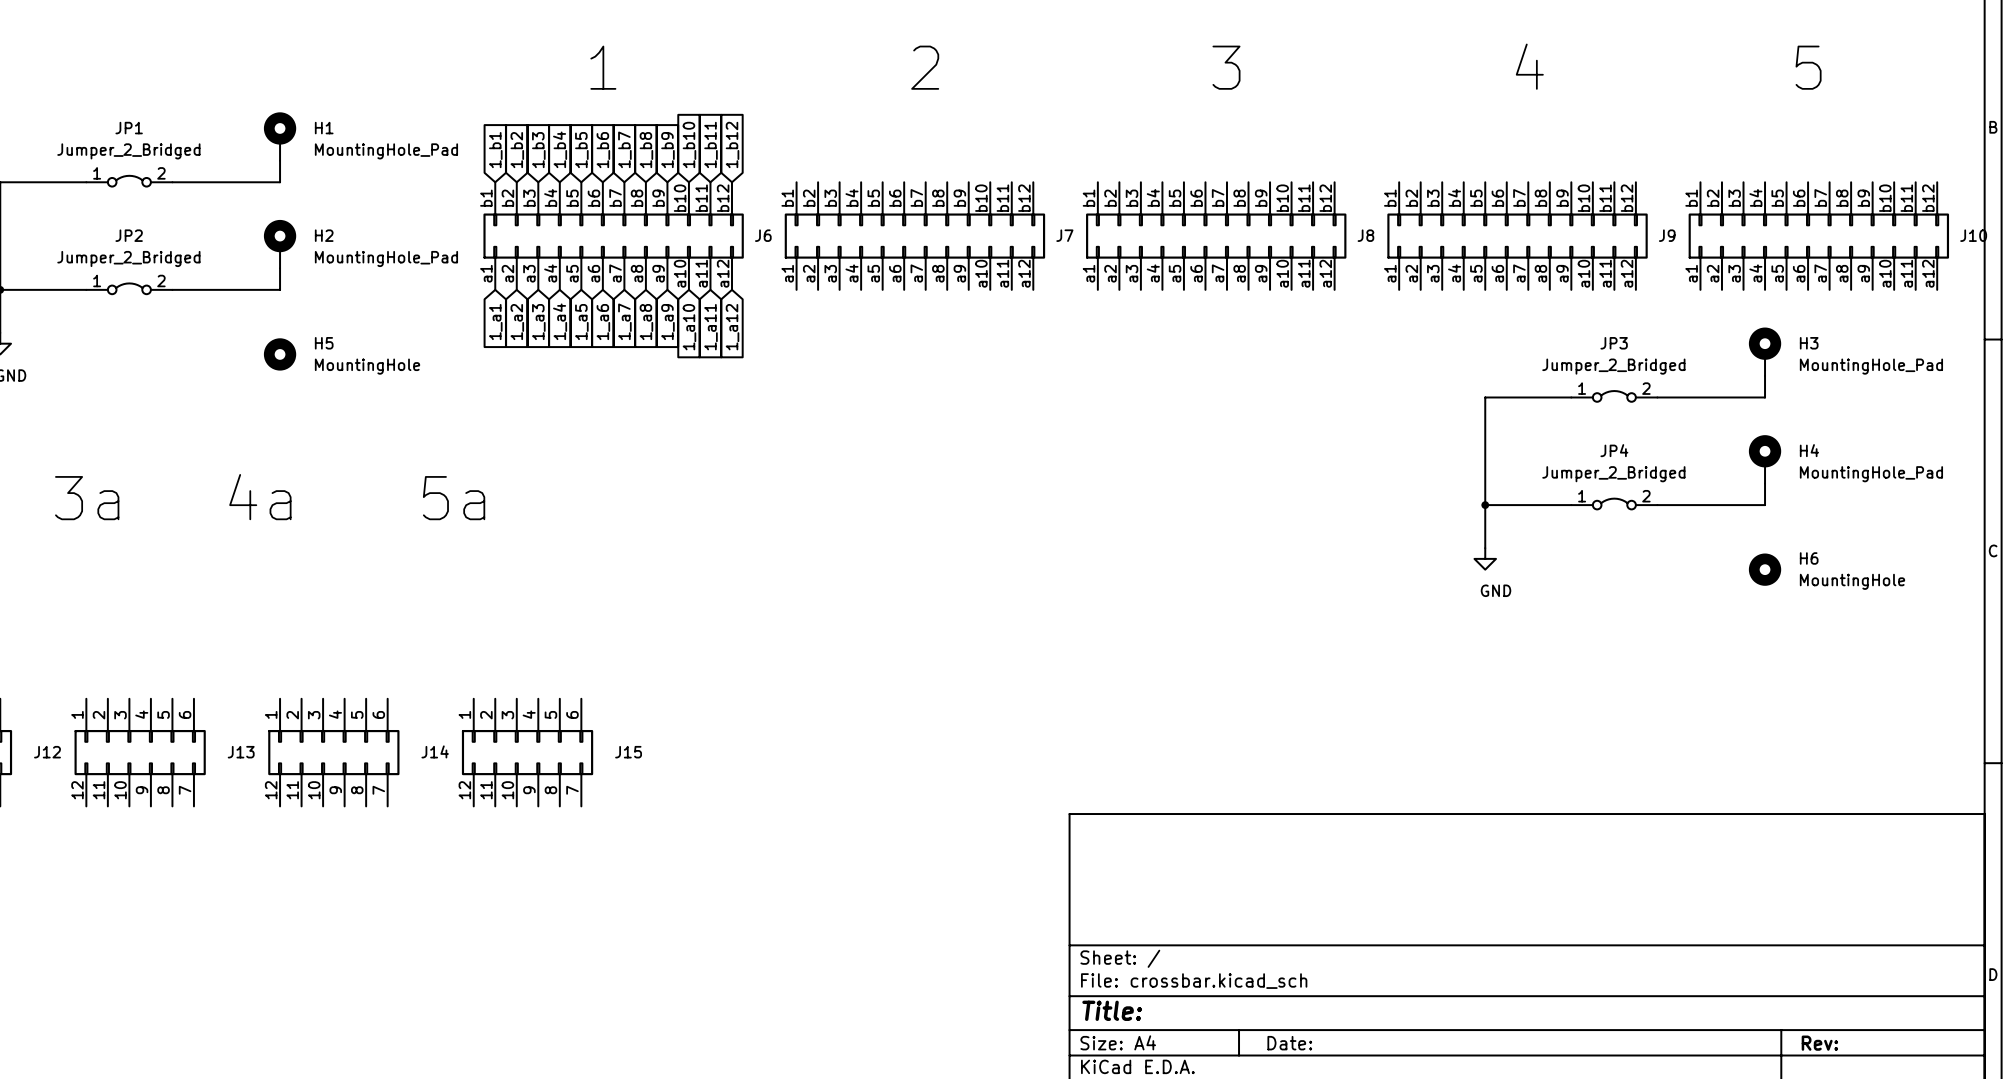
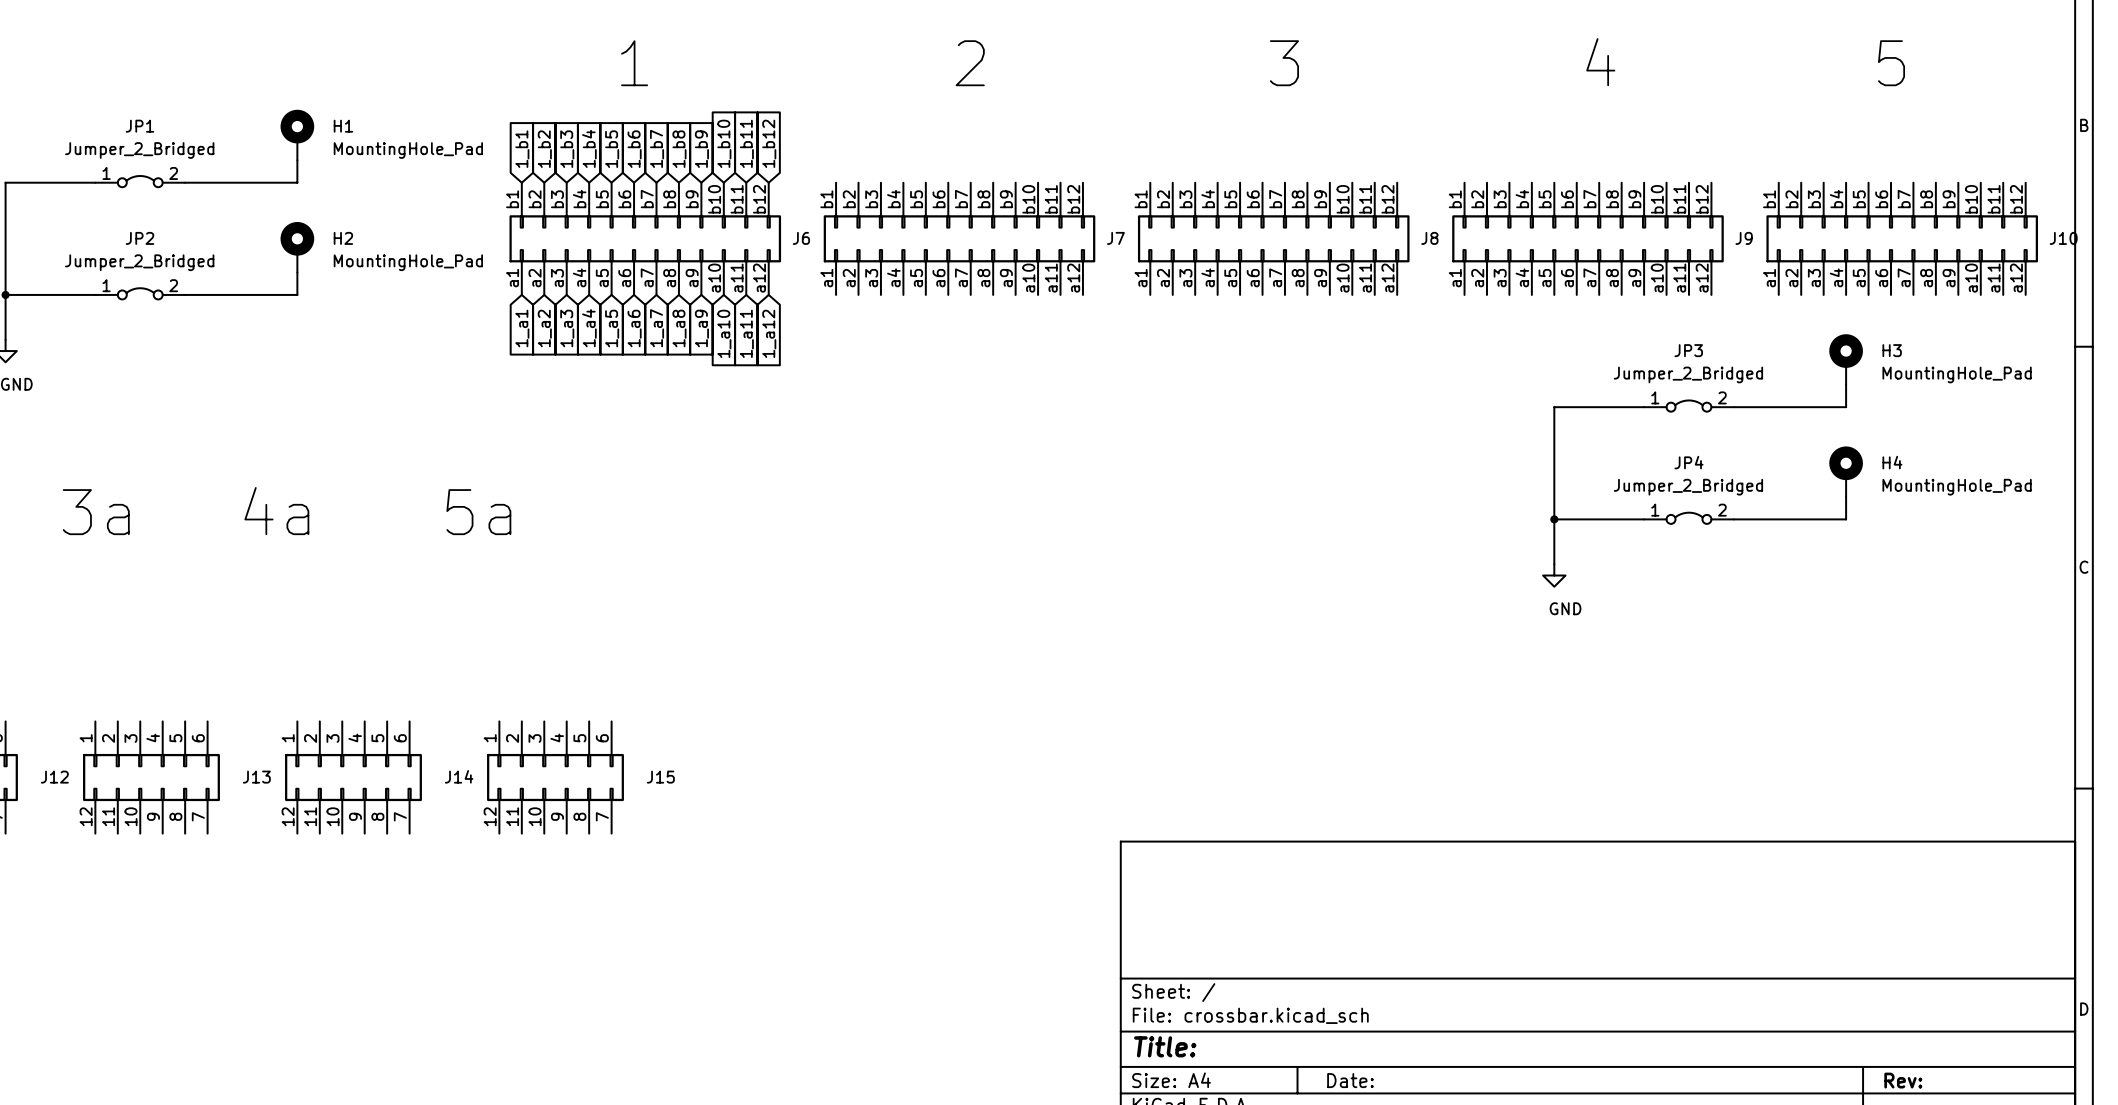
H5: MountingHole (280, 354) -> none
H6: MountingHole (1765, 569) -> none

